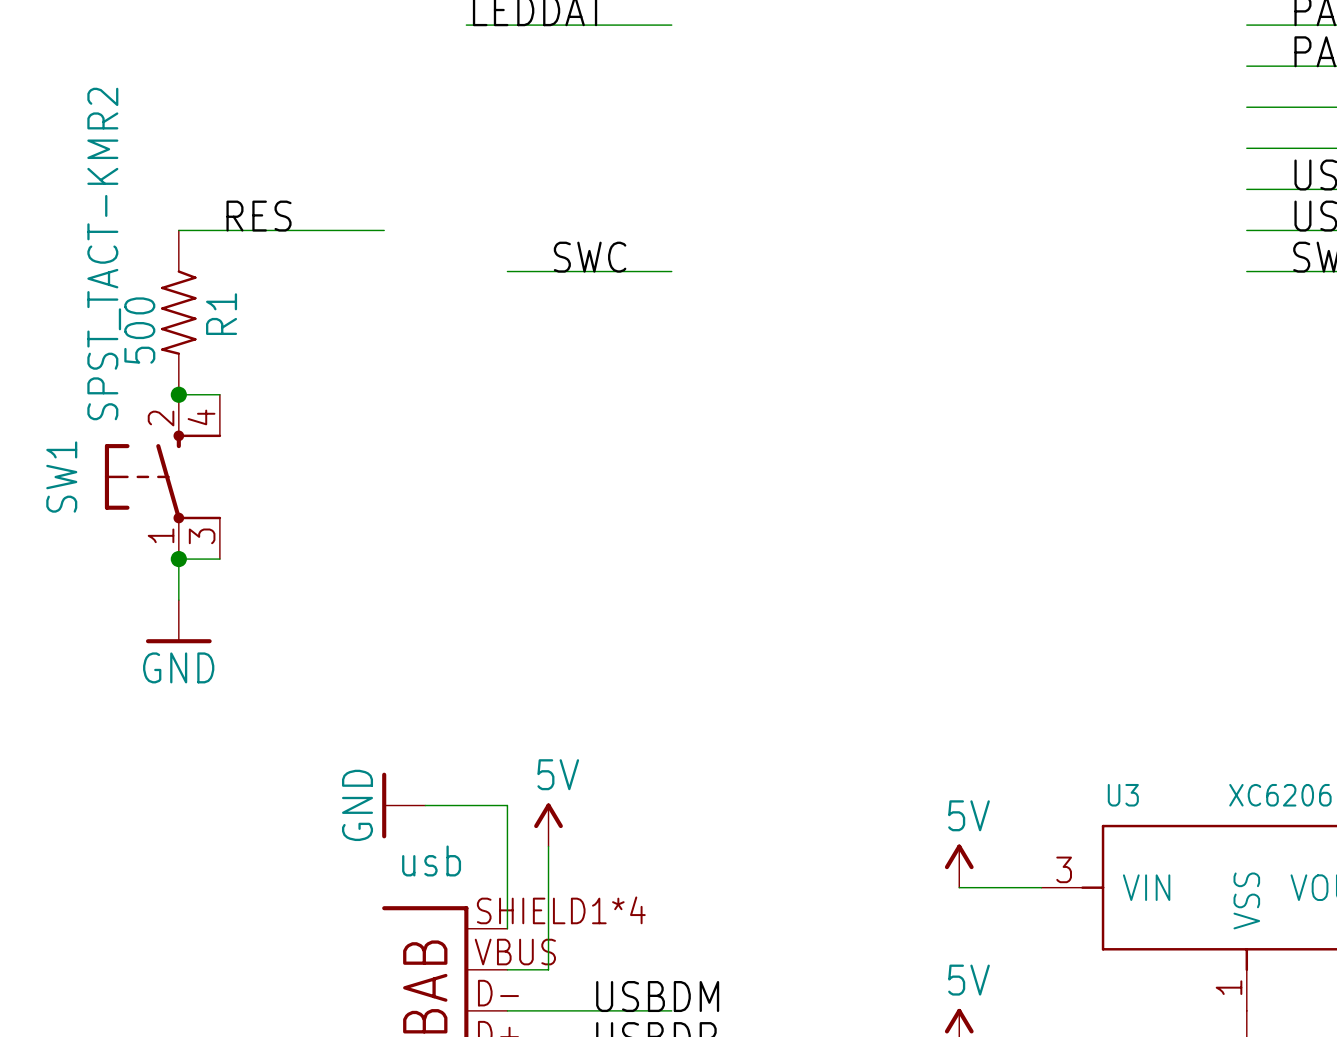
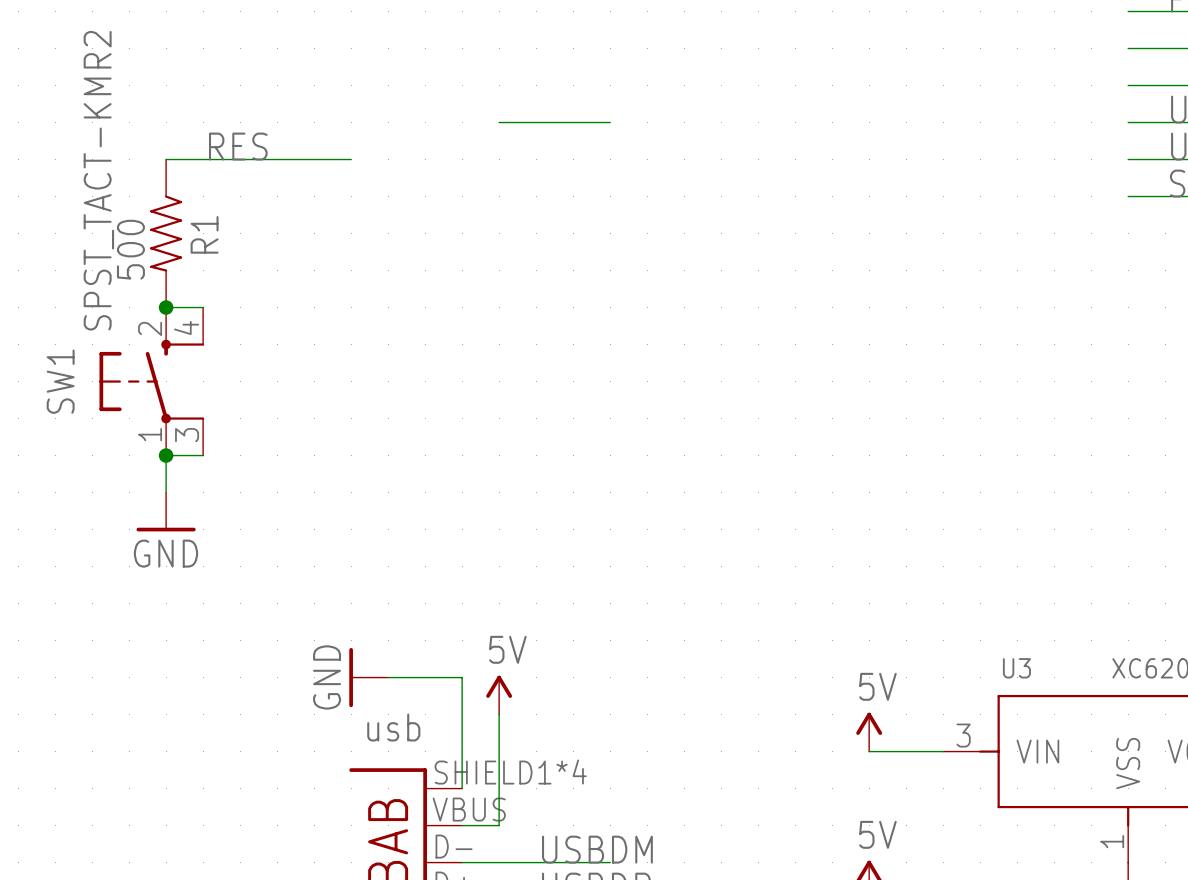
wire: none -> (499, 122) (610, 122)
label: SWC (590, 257) -> none
wire: (507, 271) (671, 271) -> none

